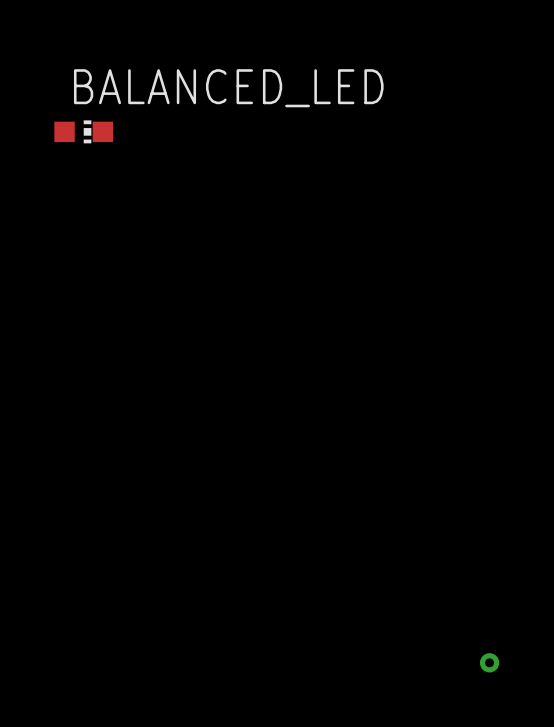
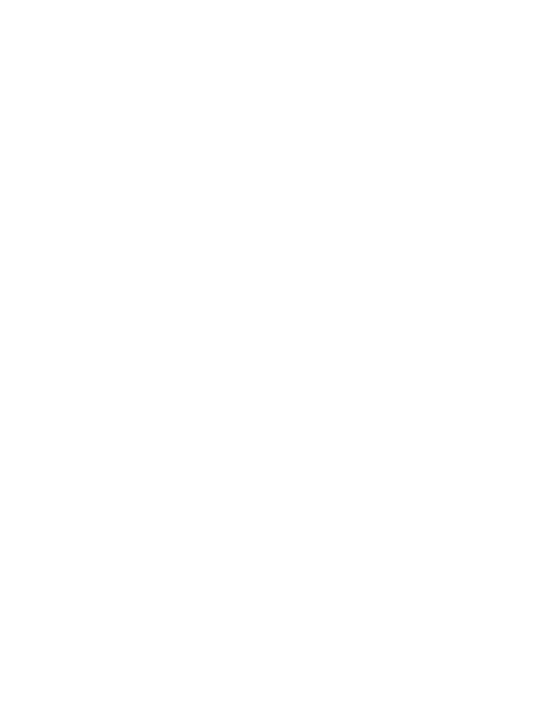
BALANCED_LED: (83, 131) -> none
via: (489, 662) -> none

